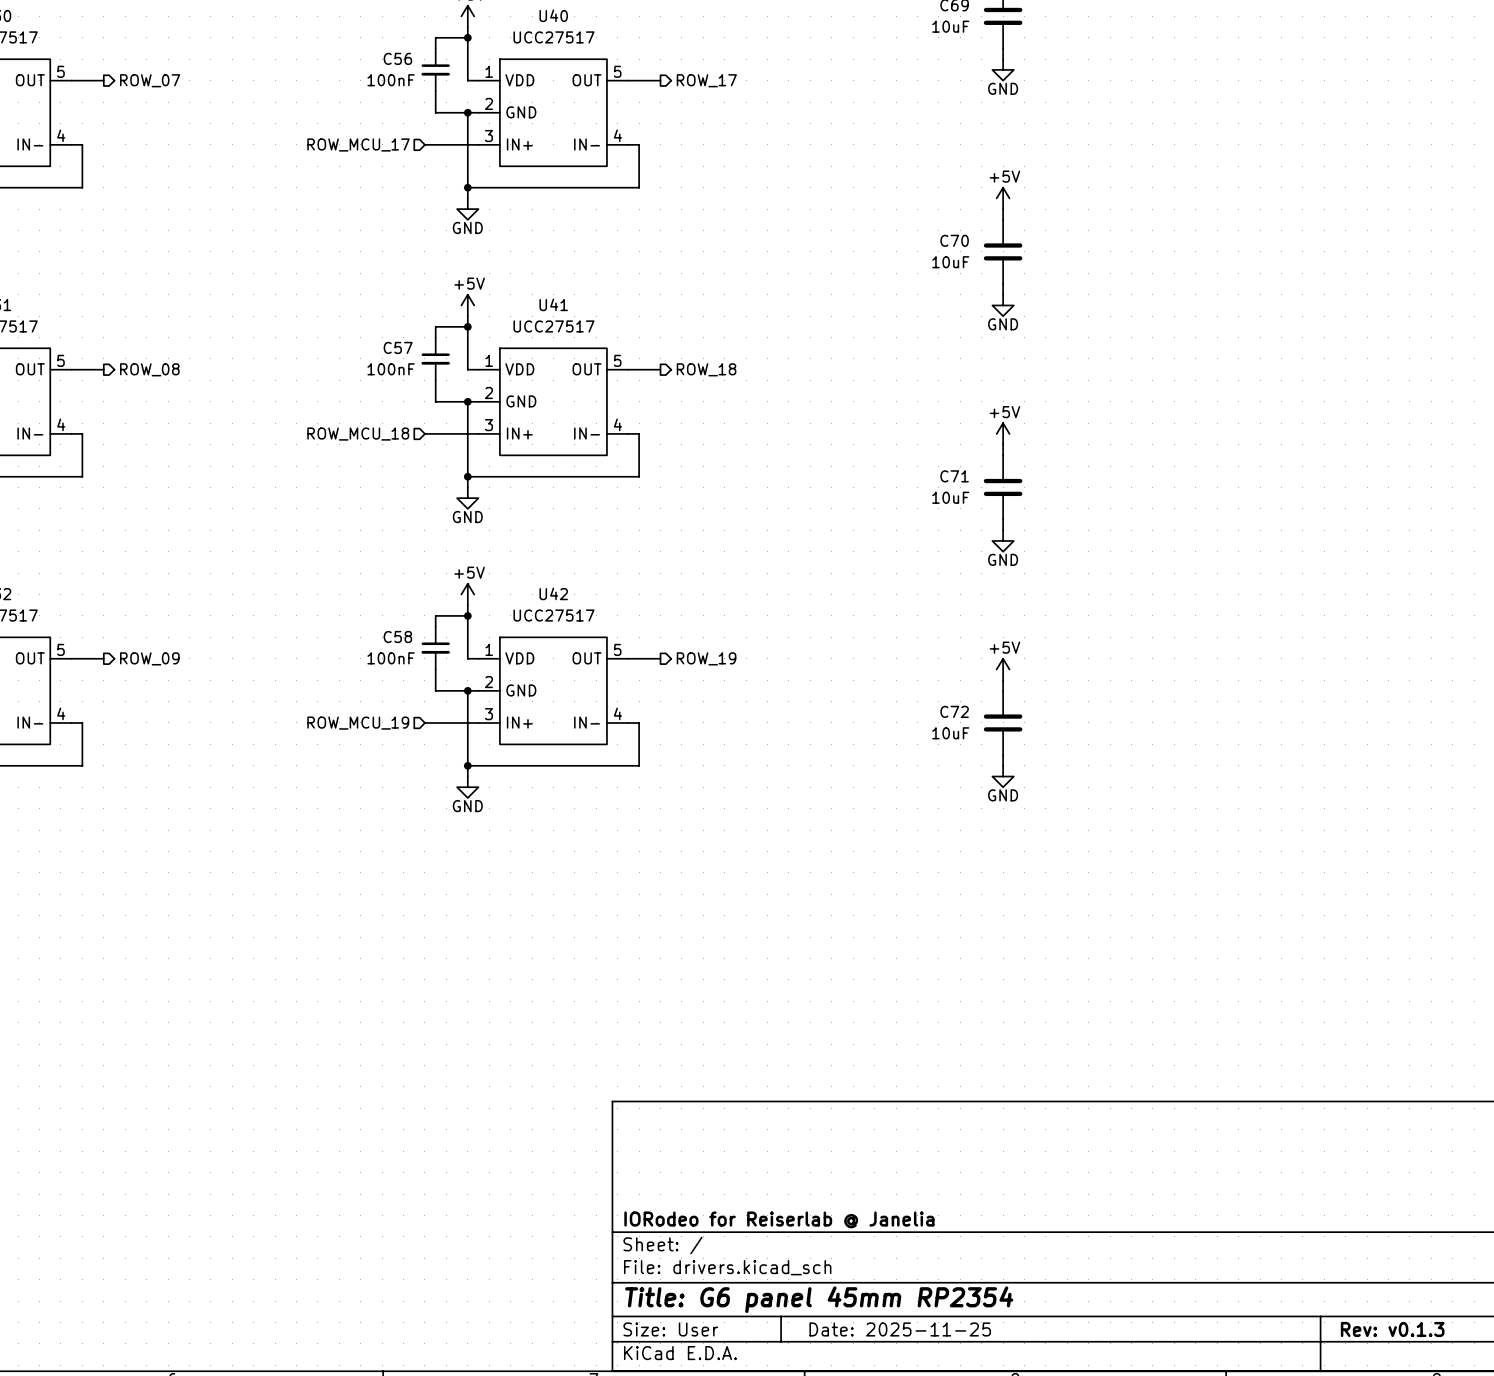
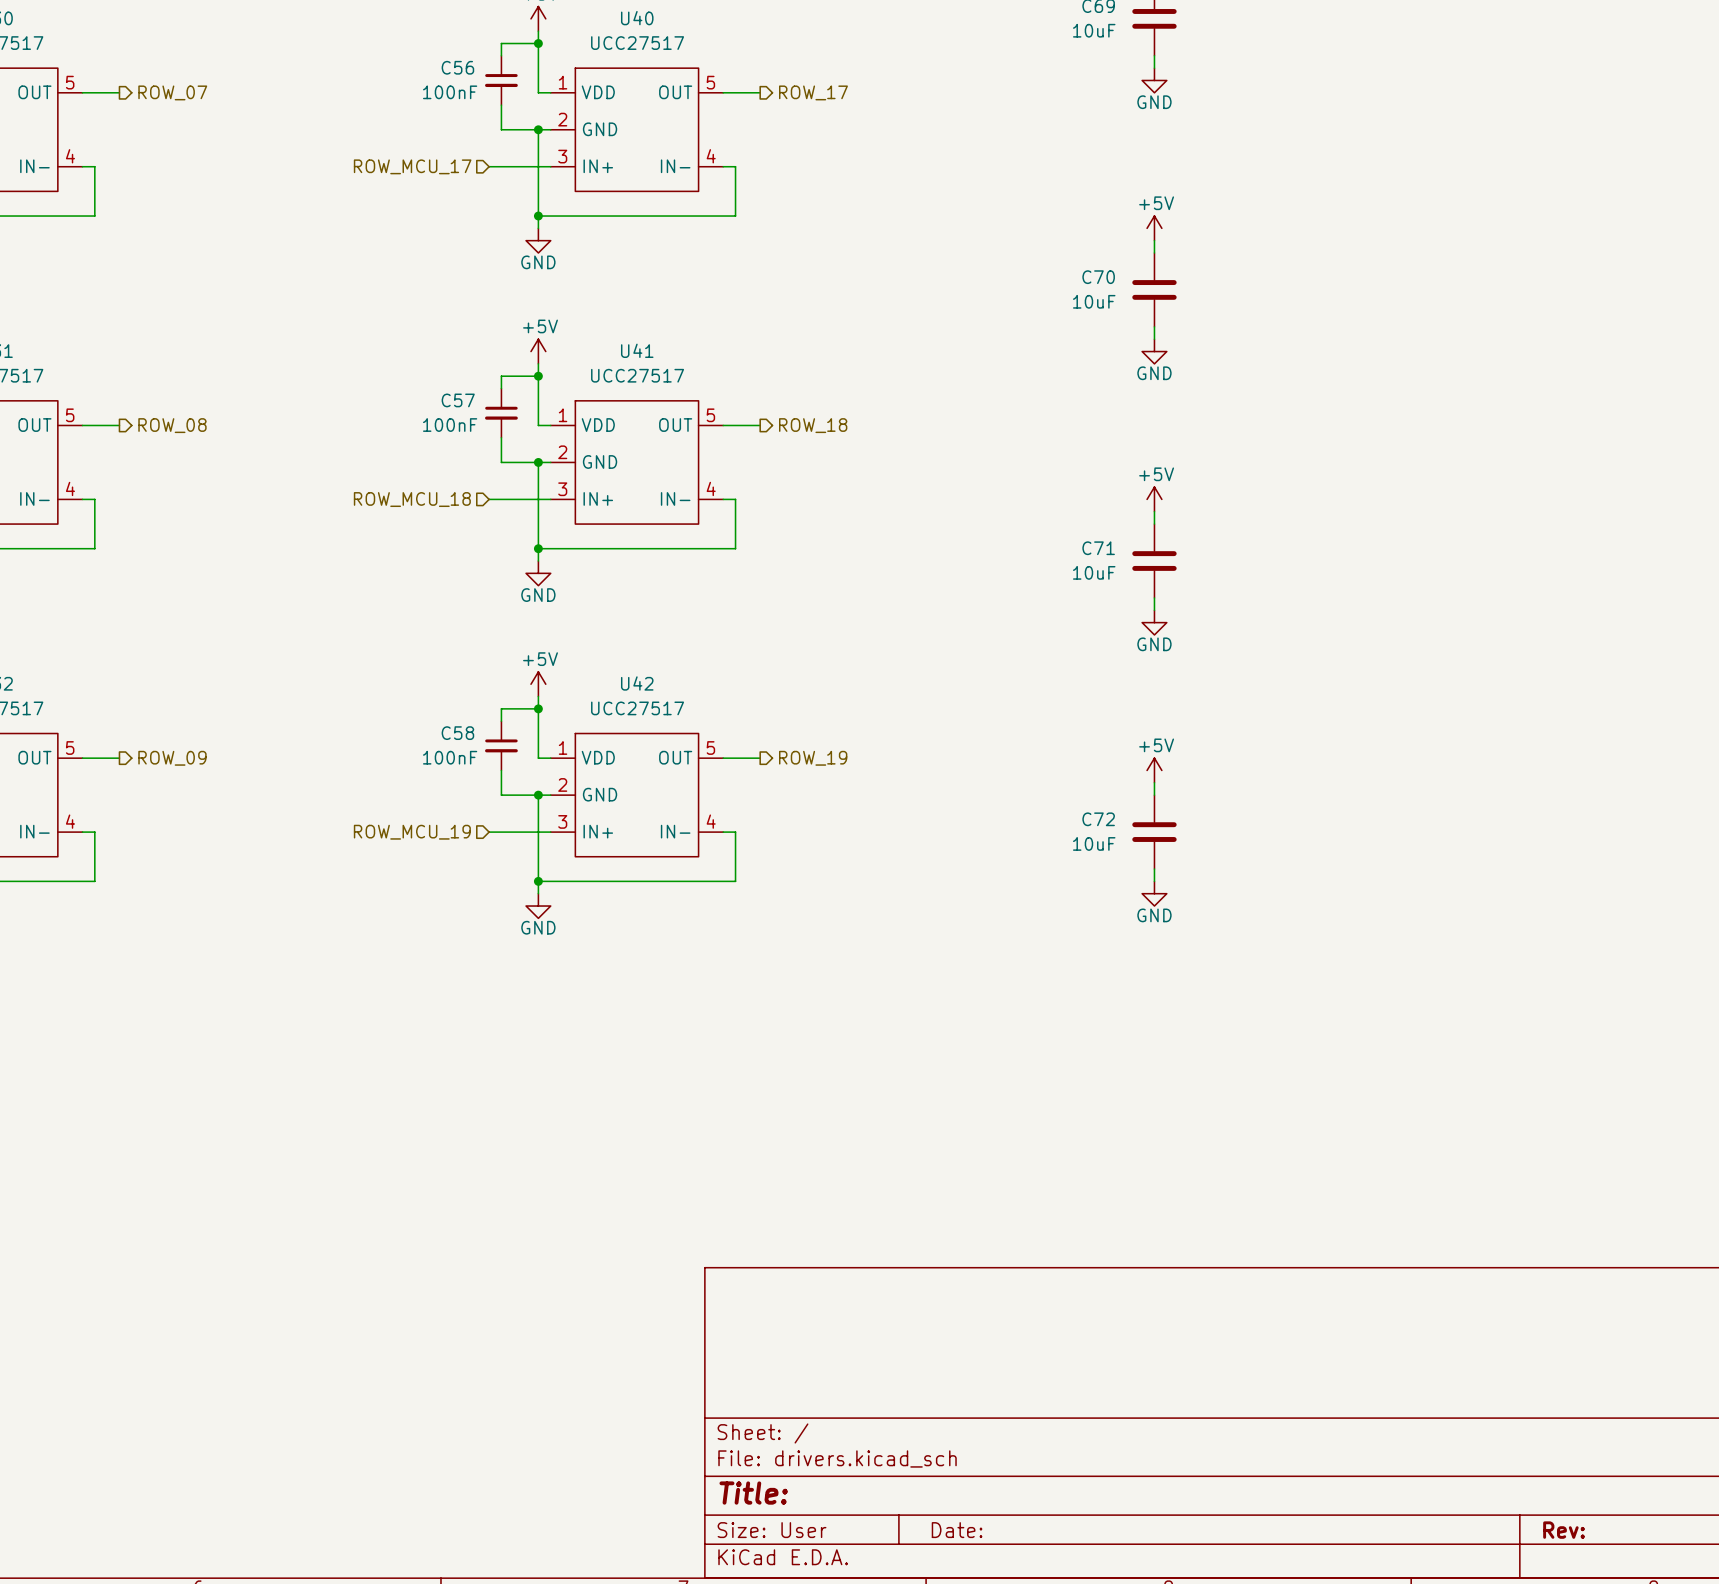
title block: IORodeo for Reiserlab @ Janelia (779, 1219) -> none
title block: Title: G6 panel 45mm RP2354 (819, 1299) -> Title: (753, 1493)
title block: Date: 2025-11-25 (900, 1329) -> Date: (957, 1530)
title block: Rev: v0.1.3 (1392, 1329) -> Rev: (1564, 1530)

